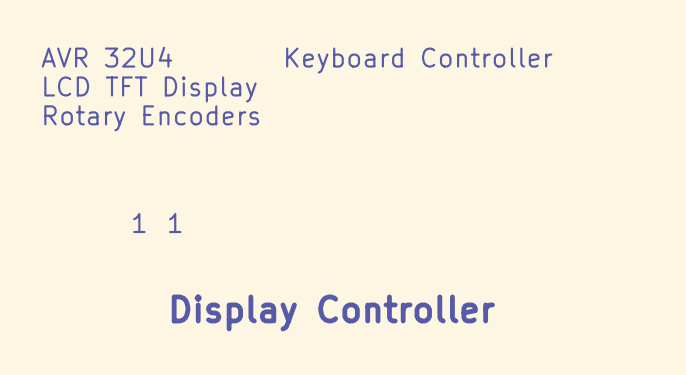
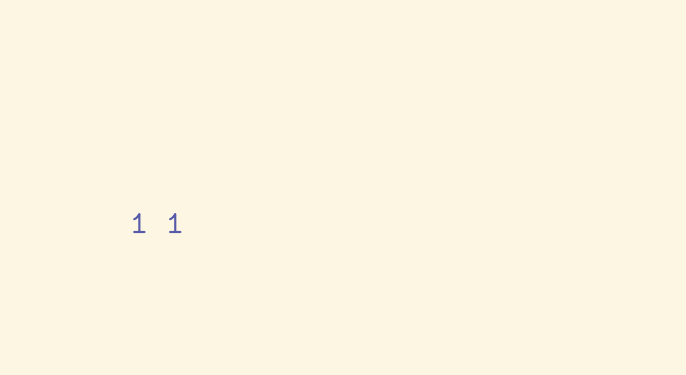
text: AVR 32U4 Keyboard Controller (297, 60) -> none
text: LCD TFT Display (150, 89) -> none
text: Rotary Encoders (151, 118) -> none
text: Display Controller (333, 312) -> none

